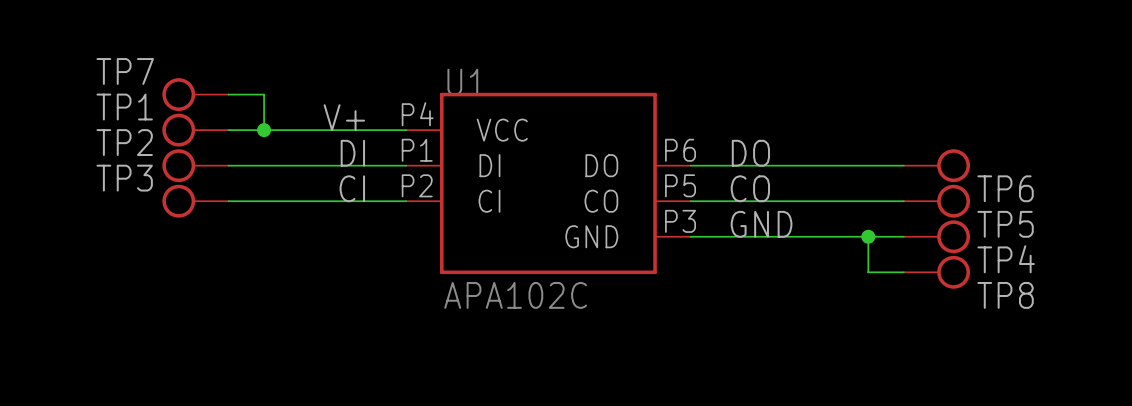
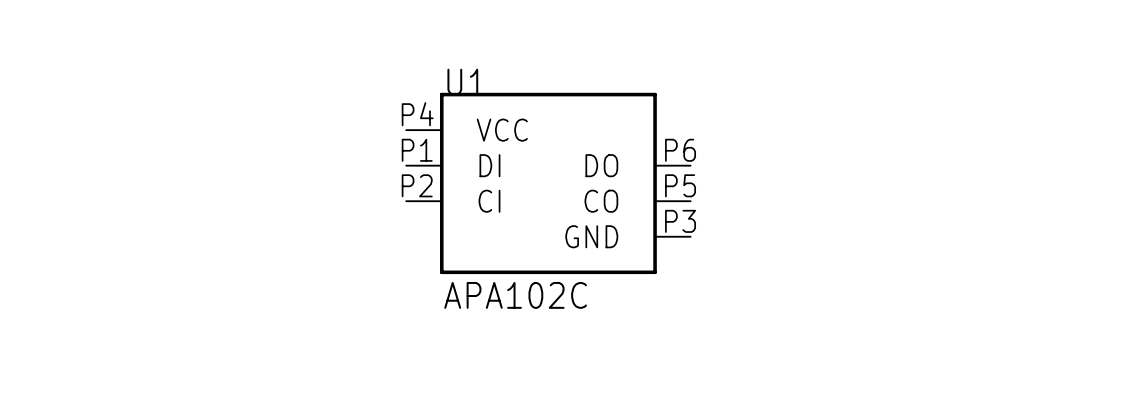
TP7: (195, 94) -> none
wire: (228, 94) (264, 94) (264, 130) -> none
label: V+ (344, 117) -> none
TP1: (195, 130) -> none
wire: (228, 130) (406, 130) -> none
junction: (264, 130) -> none
label: DI (352, 153) -> none
label: DO (750, 153) -> none
TP2: (195, 165) -> none
wire: (228, 165) (406, 165) -> none
wire: (690, 165) (903, 165) -> none
TP6: (936, 165) -> none
label: CI (352, 188) -> none
label: CO (750, 188) -> none
TP3: (195, 201) -> none
wire: (228, 201) (406, 201) -> none
wire: (690, 201) (903, 201) -> none
TP5: (936, 201) -> none
label: GND (761, 224) -> none
wire: (690, 236) (903, 236) -> none
wire: (868, 236) (868, 272) (903, 272) -> none
junction: (868, 236) -> none
TP4: (936, 236) -> none
TP8: (936, 272) -> none

